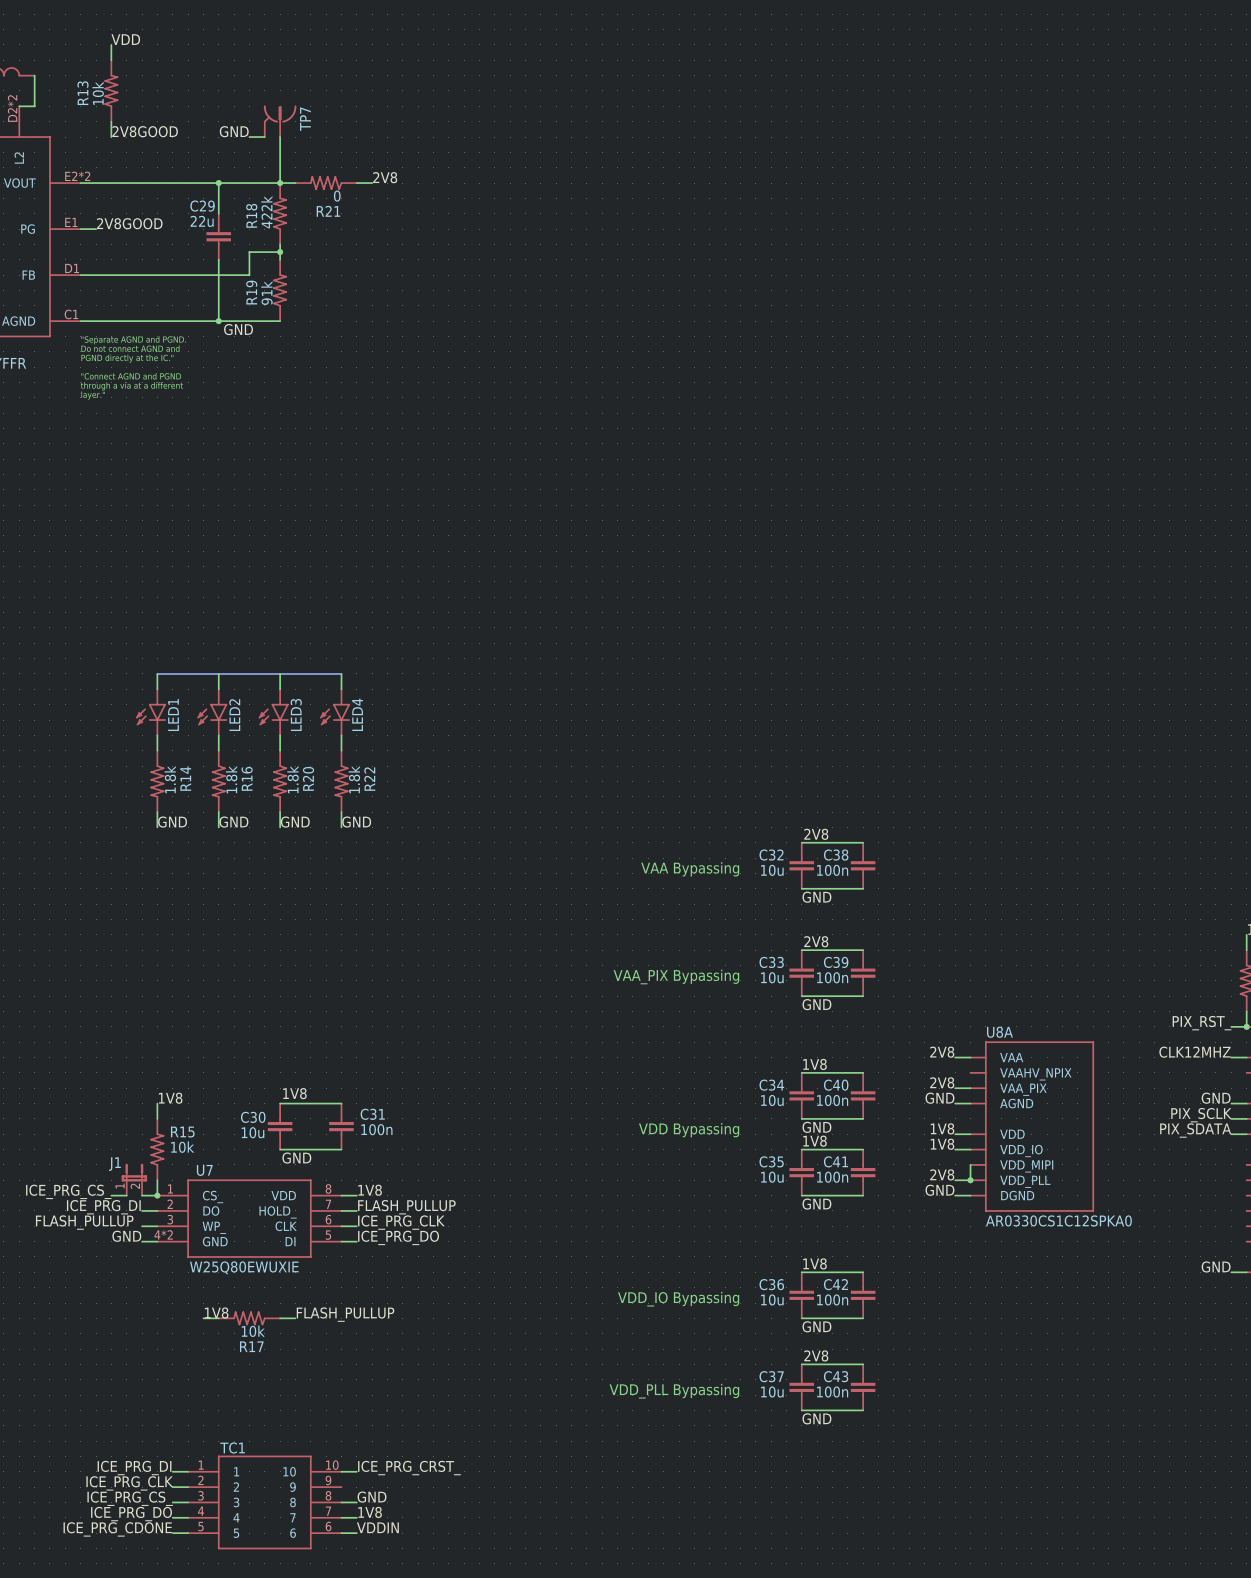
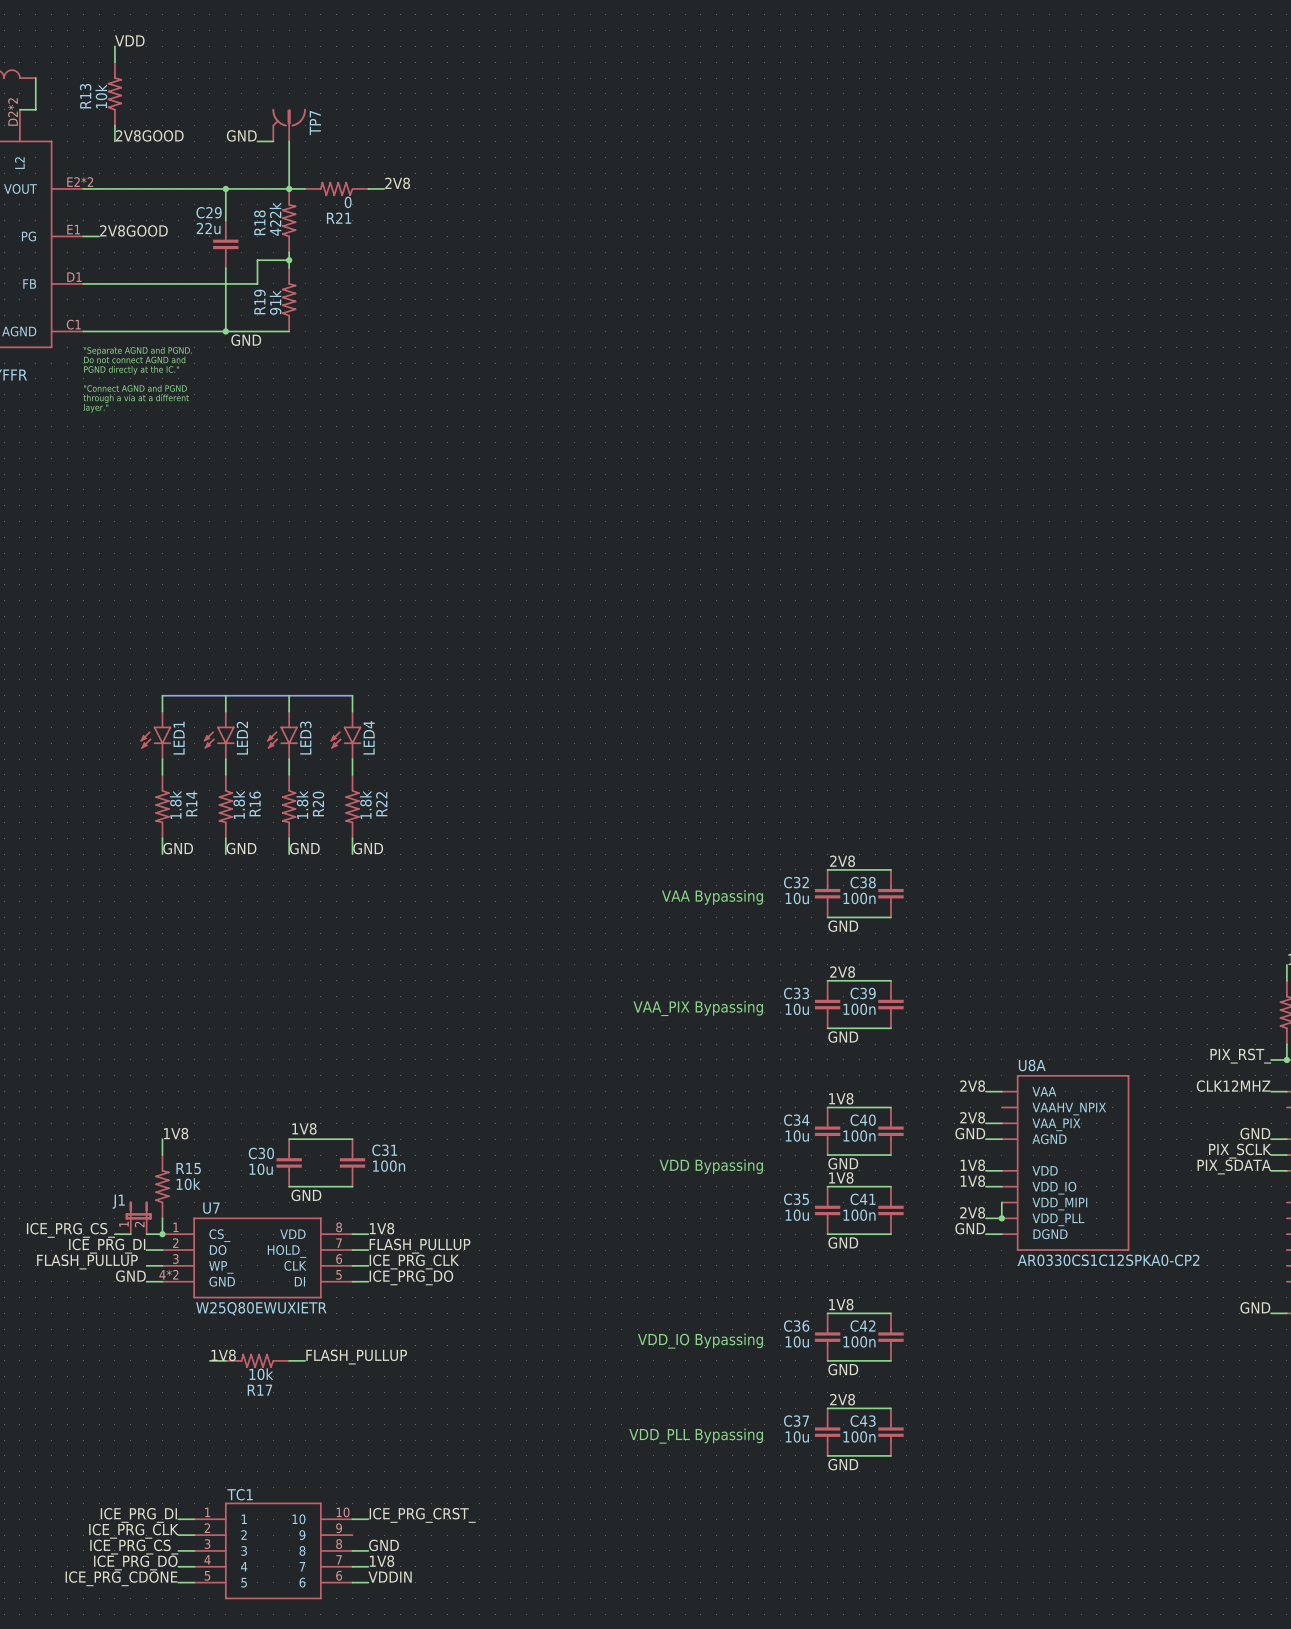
U8A text: AR0330CS1C12SPKA0 (1058, 1220) -> AR0330CS1C12SPKA0-CP2 (1108, 1260)
U7 text: W25Q80EWUXIE (244, 1267) -> W25Q80EWUXIETR (261, 1308)

